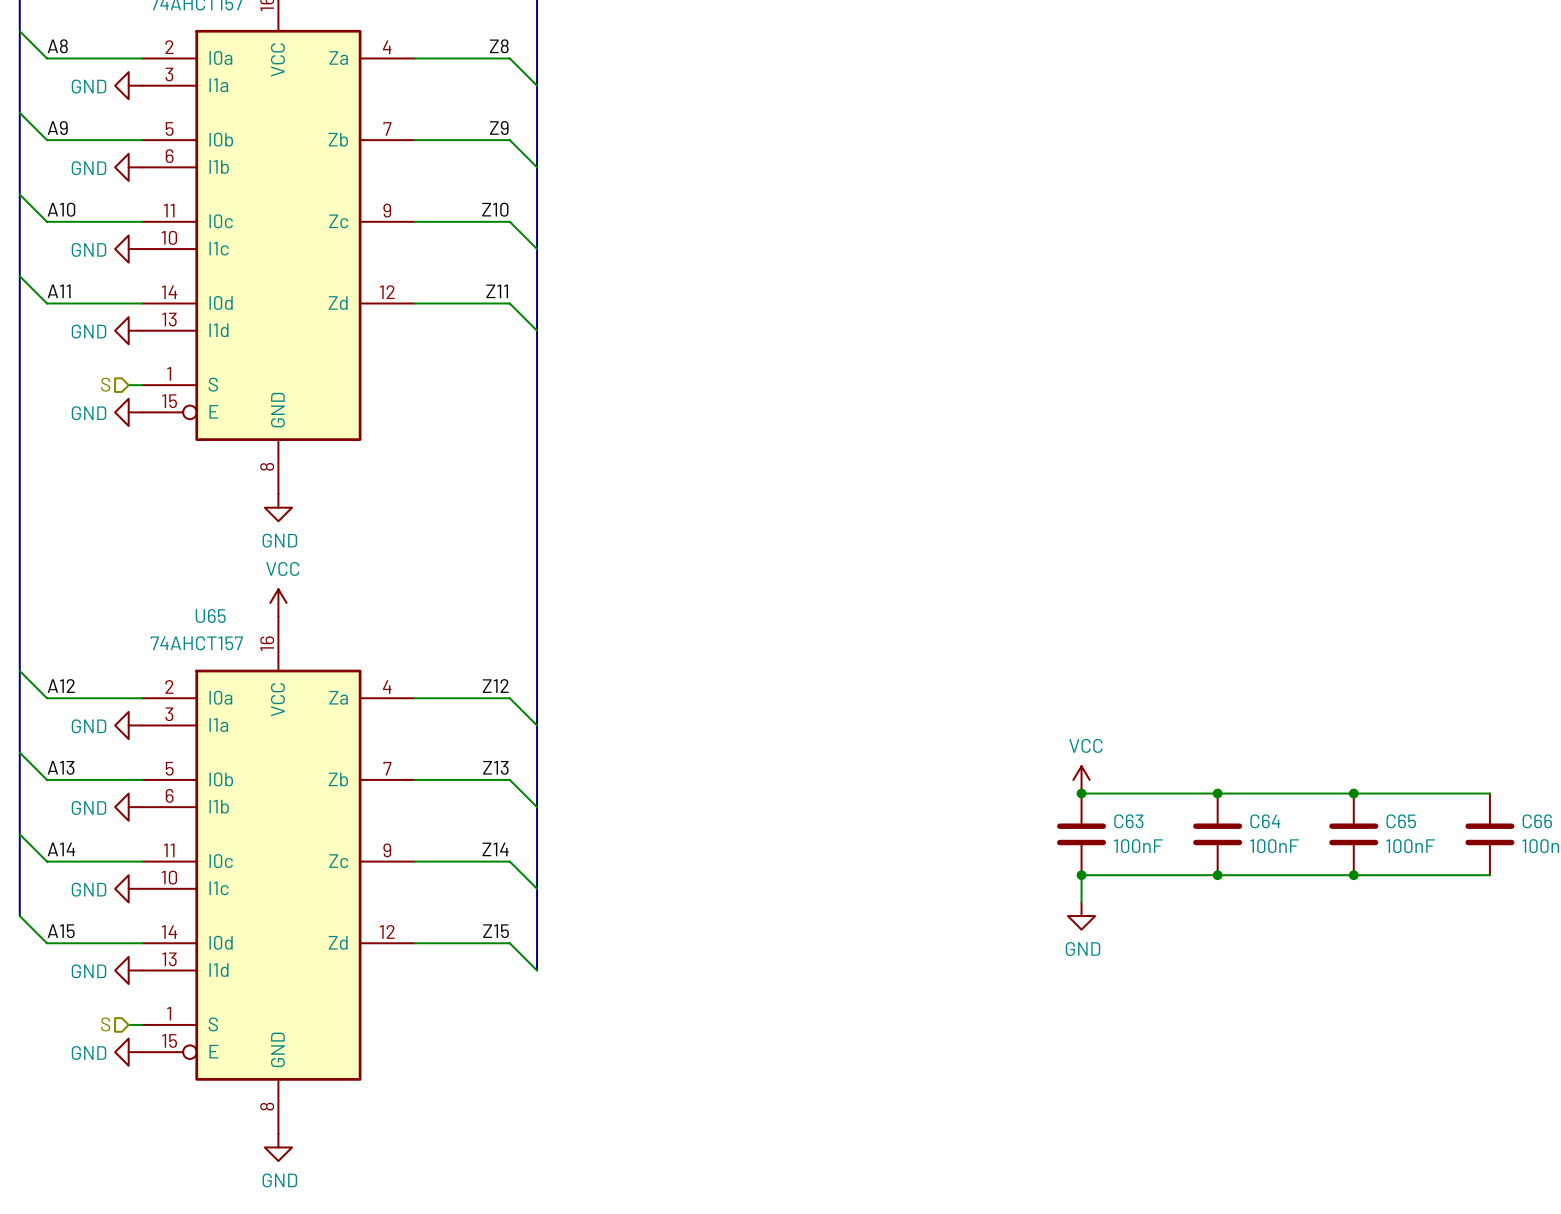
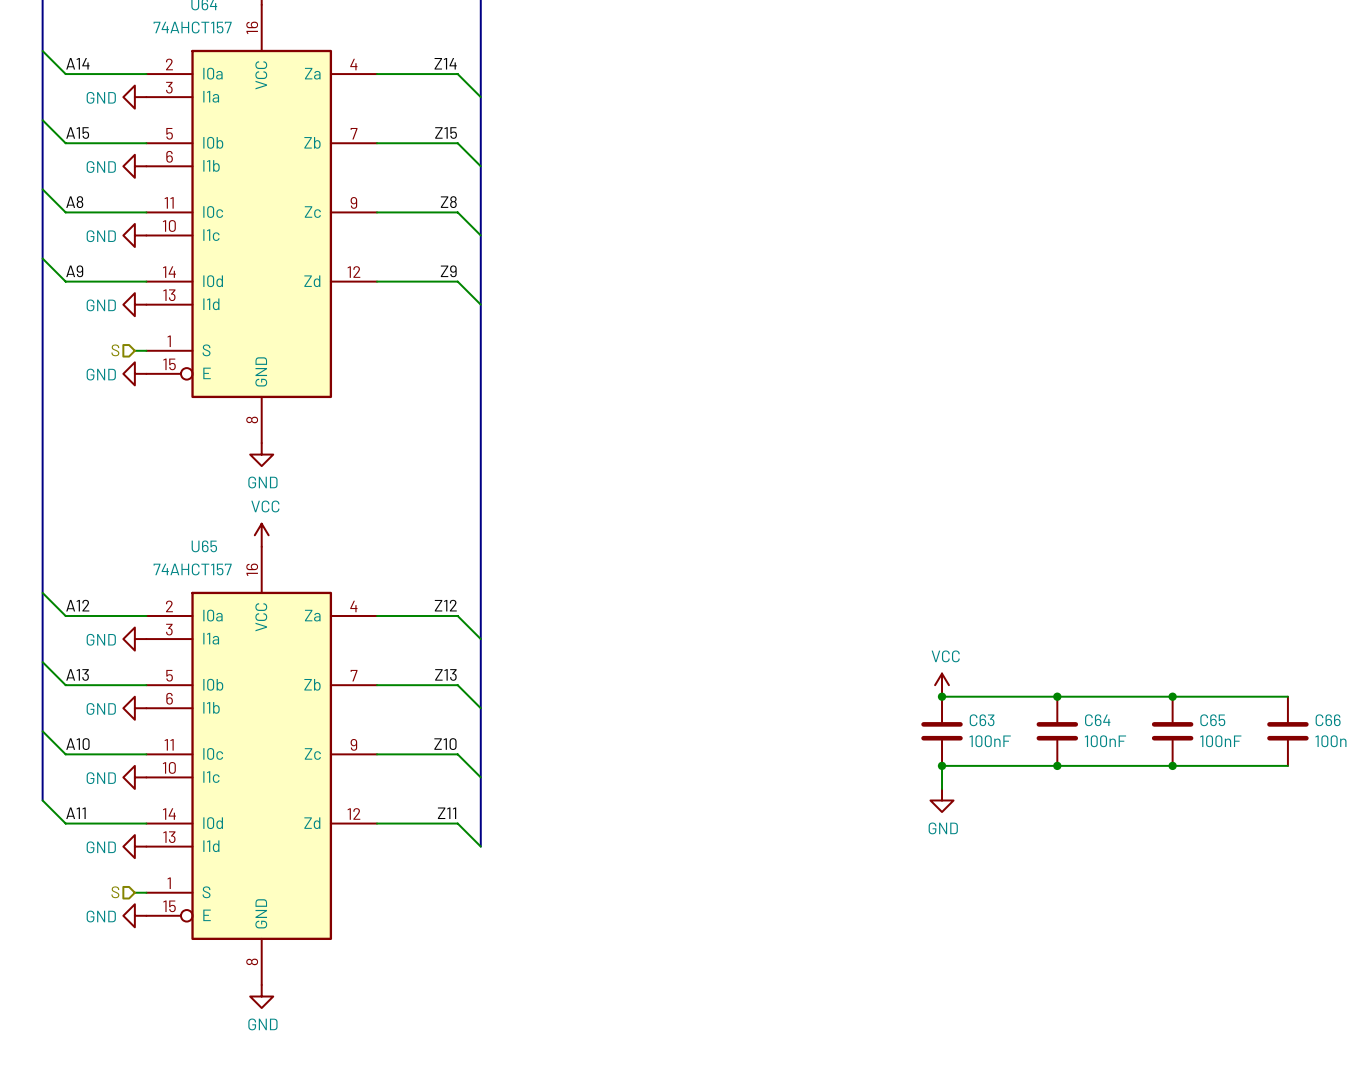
label: A8 (57, 46) -> A14 (77, 63)
label: Z8 (499, 46) -> Z14 (445, 63)
label: A9 (57, 128) -> A15 (77, 133)
label: Z9 (499, 128) -> Z15 (446, 133)
label: A10 (61, 209) -> A8 (74, 202)
label: Z10 (495, 209) -> Z8 (448, 202)
label: A11 (59, 291) -> A9 (74, 271)
label: Z11 (497, 291) -> Z9 (448, 271)
label: A14 (61, 849) -> A10 (77, 744)
label: Z14 (495, 849) -> Z10 (445, 744)
label: A15 (61, 931) -> A11 (75, 813)
label: Z15 (496, 931) -> Z11 (447, 813)

